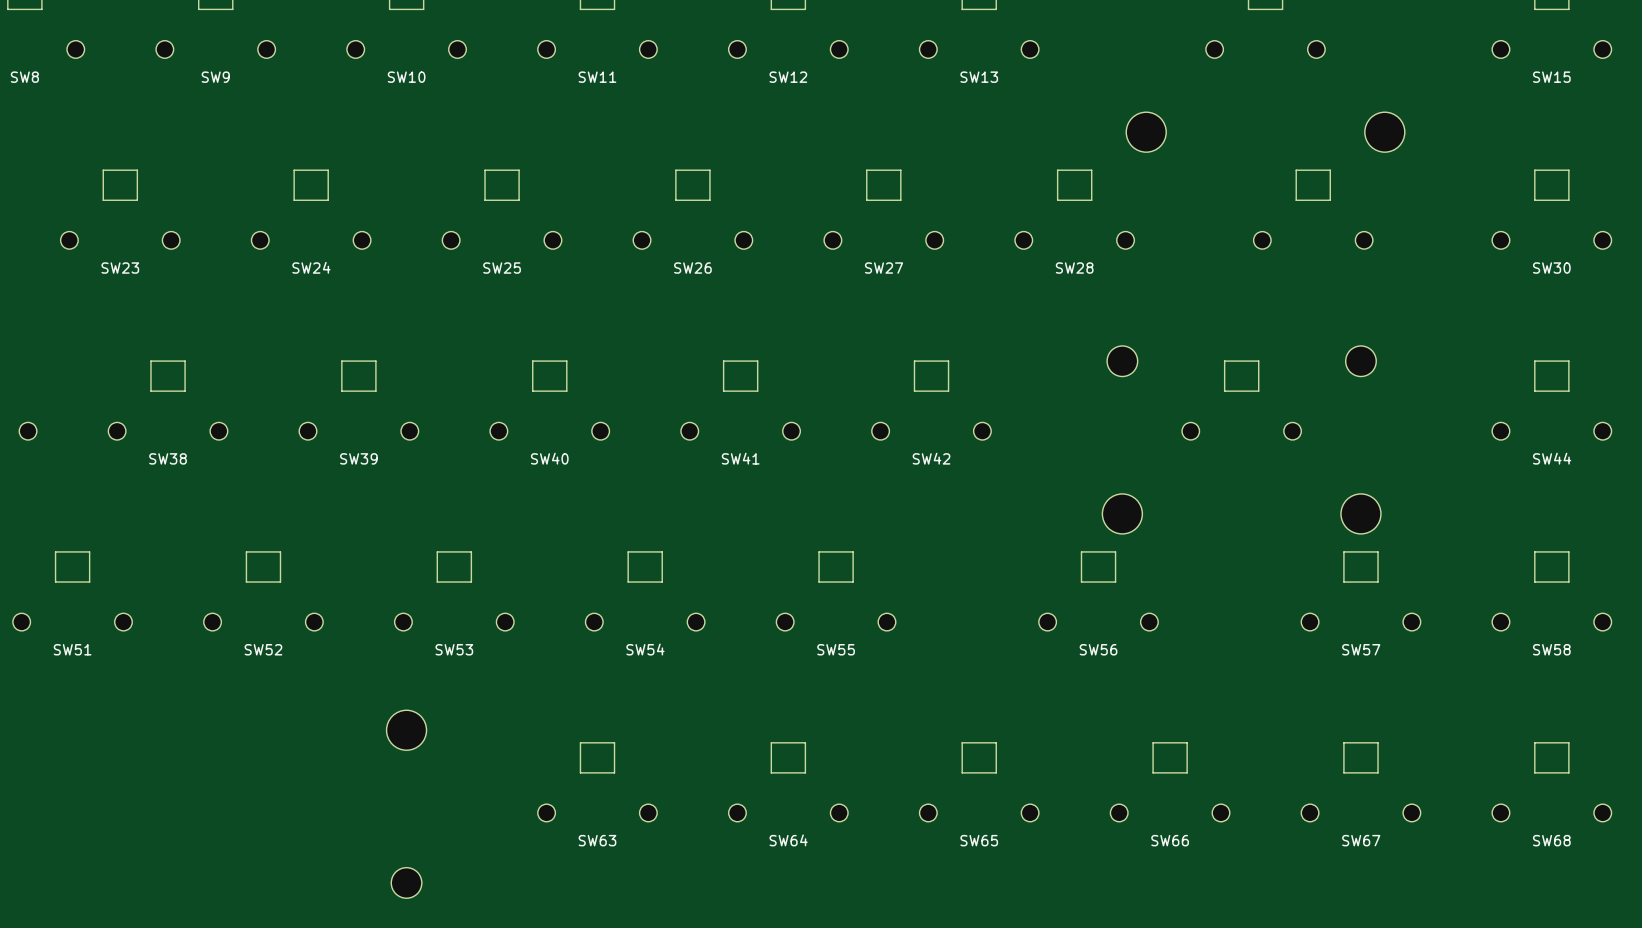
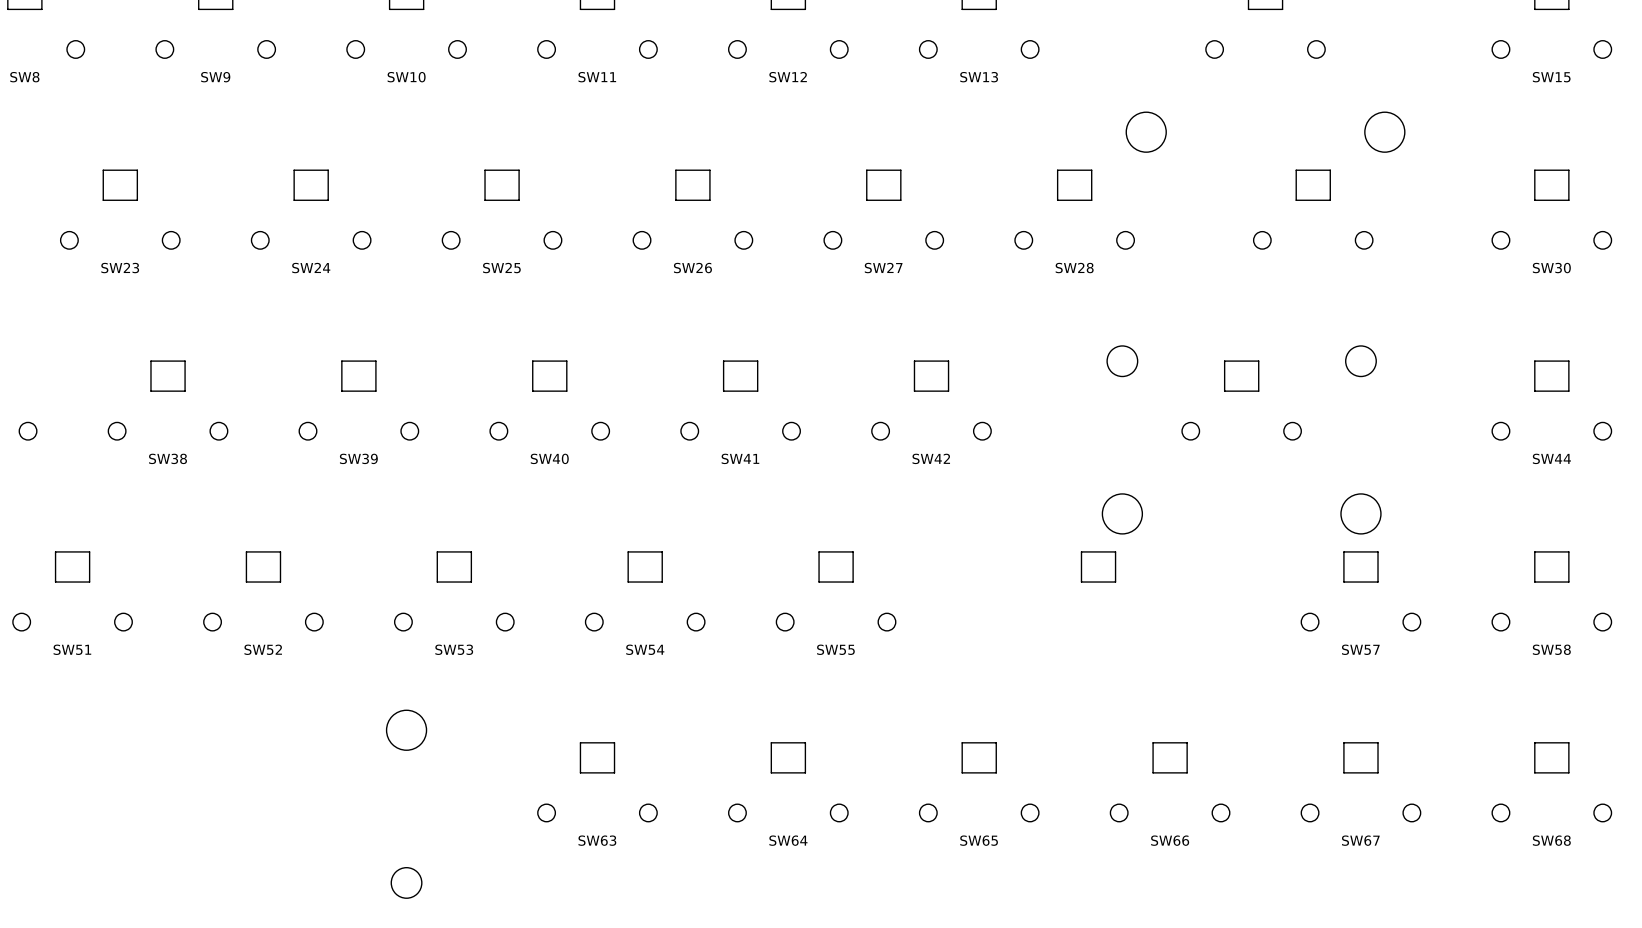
SW56: (1098, 622) -> none

